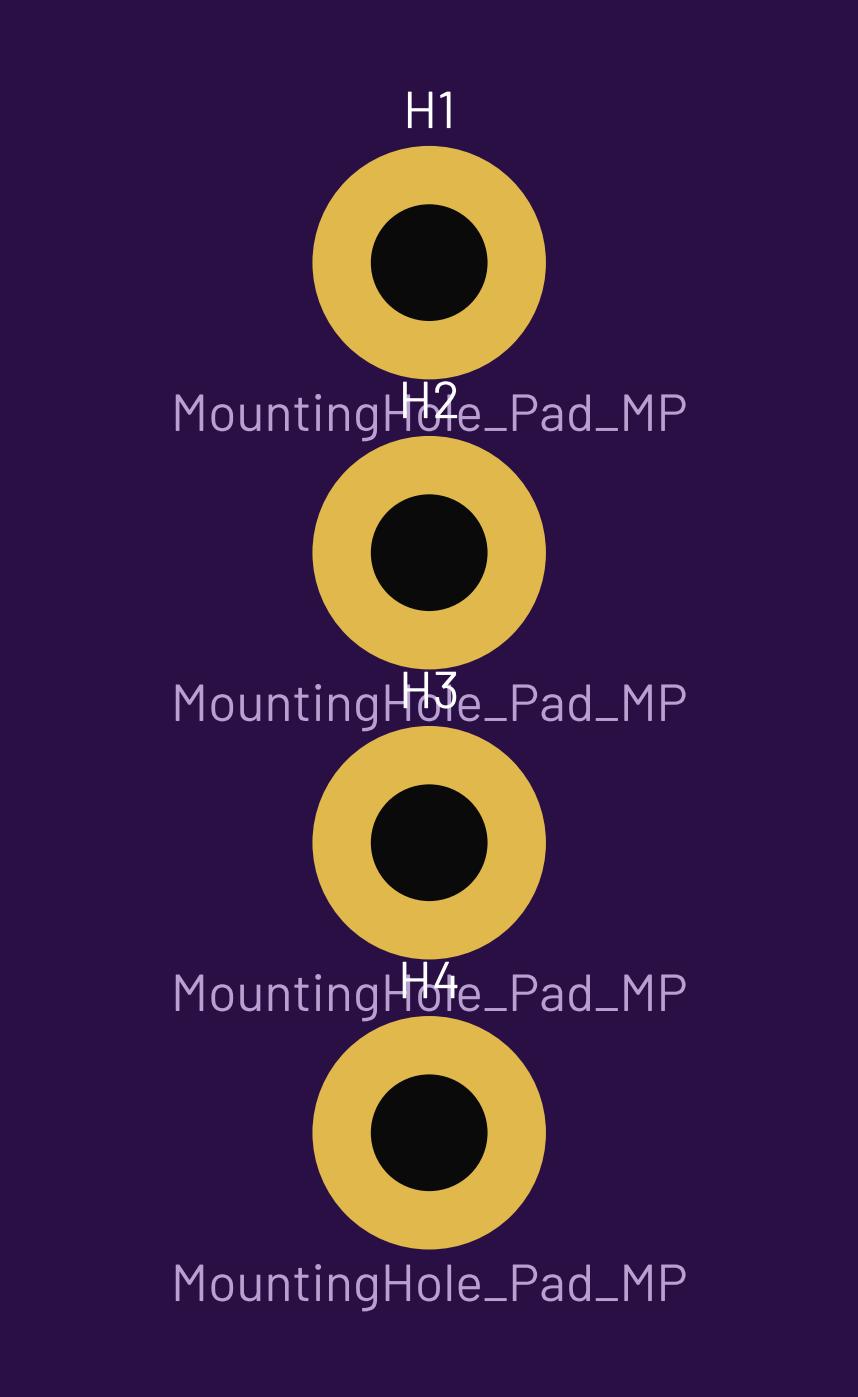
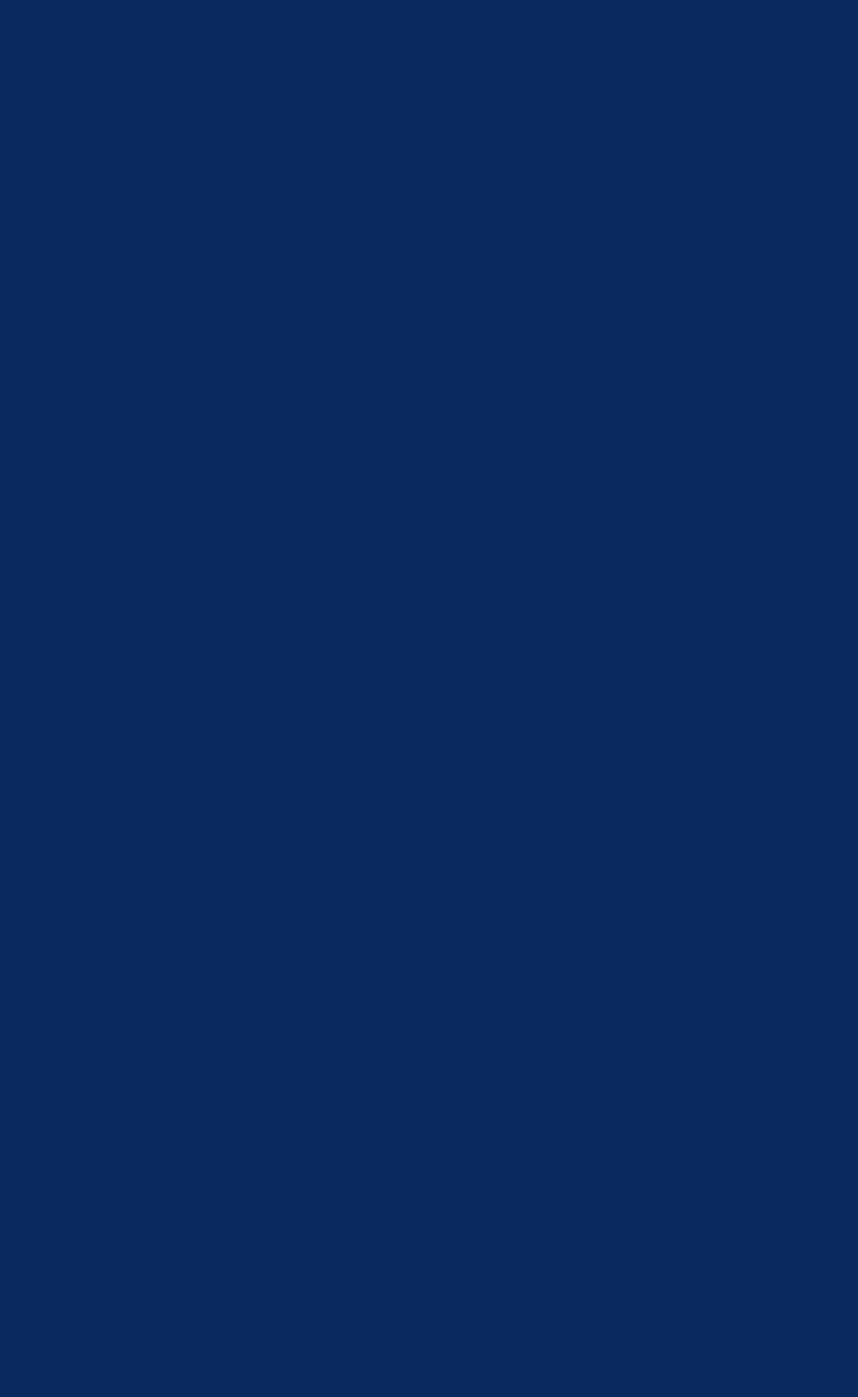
H1: MountingHole_Pad_MP (429, 262) -> none
H2: MountingHole_Pad_MP (429, 552) -> none
H3: MountingHole_Pad_MP (429, 842) -> none
H4: MountingHole_Pad_MP (429, 1132) -> none

